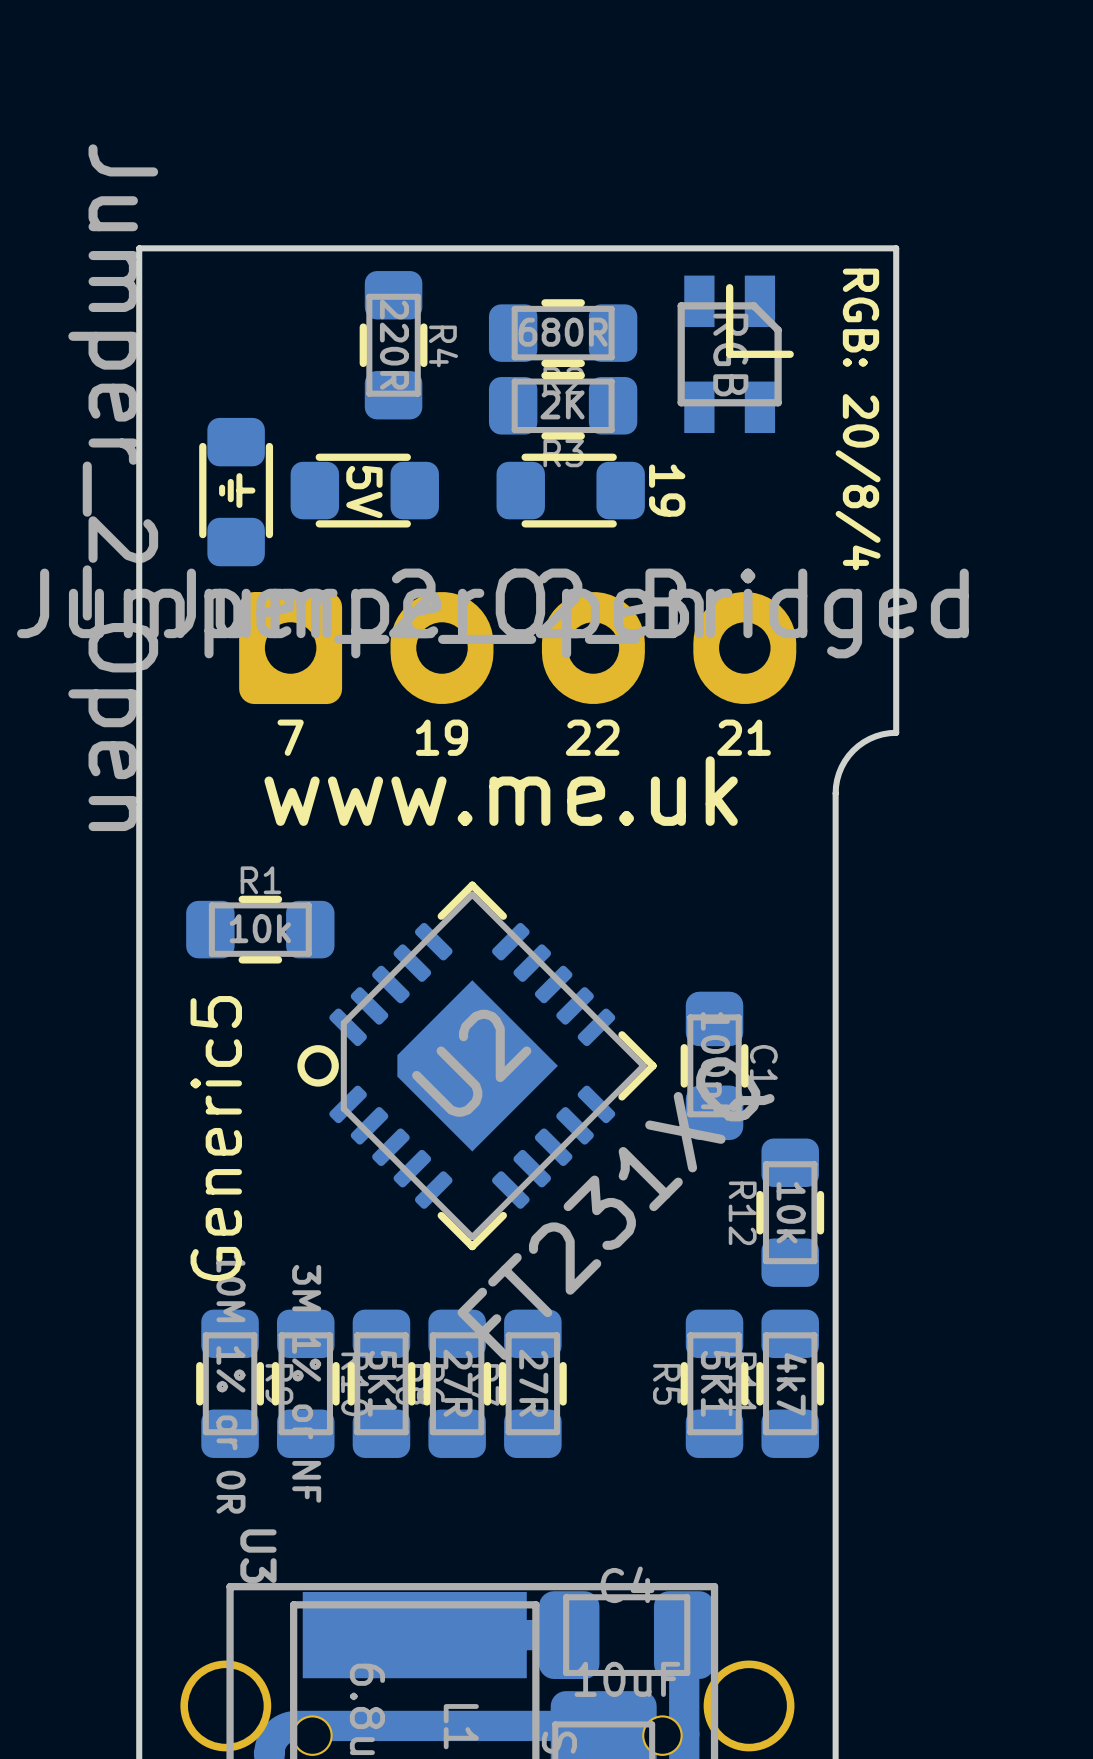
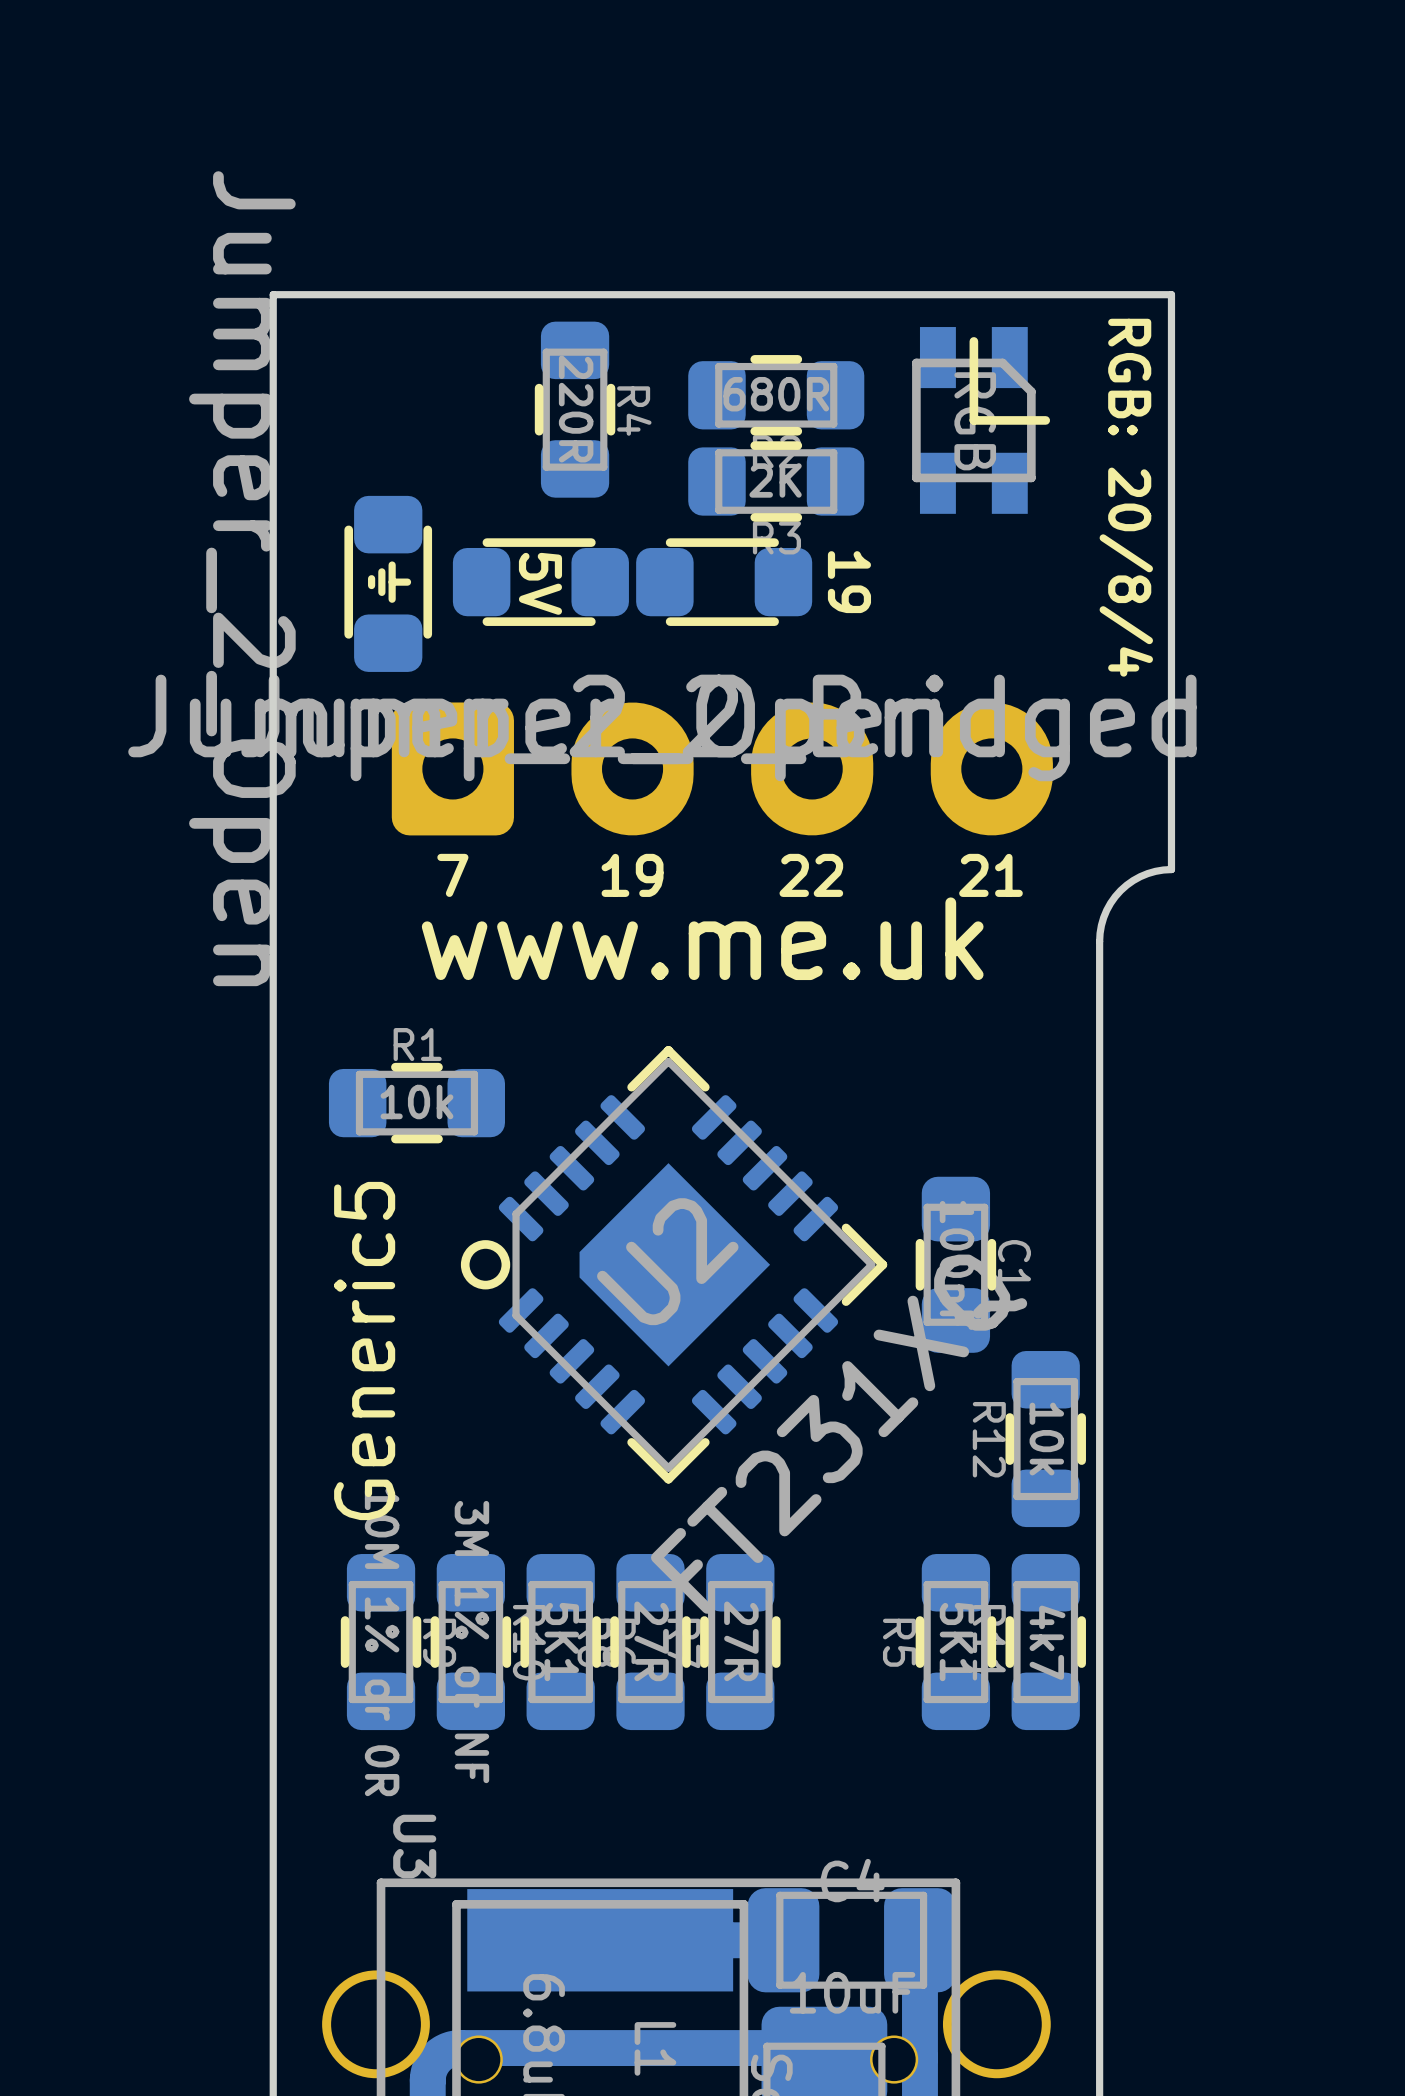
part position: (570, 490) -> (724, 582)
text position: 19 (667, 490) -> 19 (849, 582)

